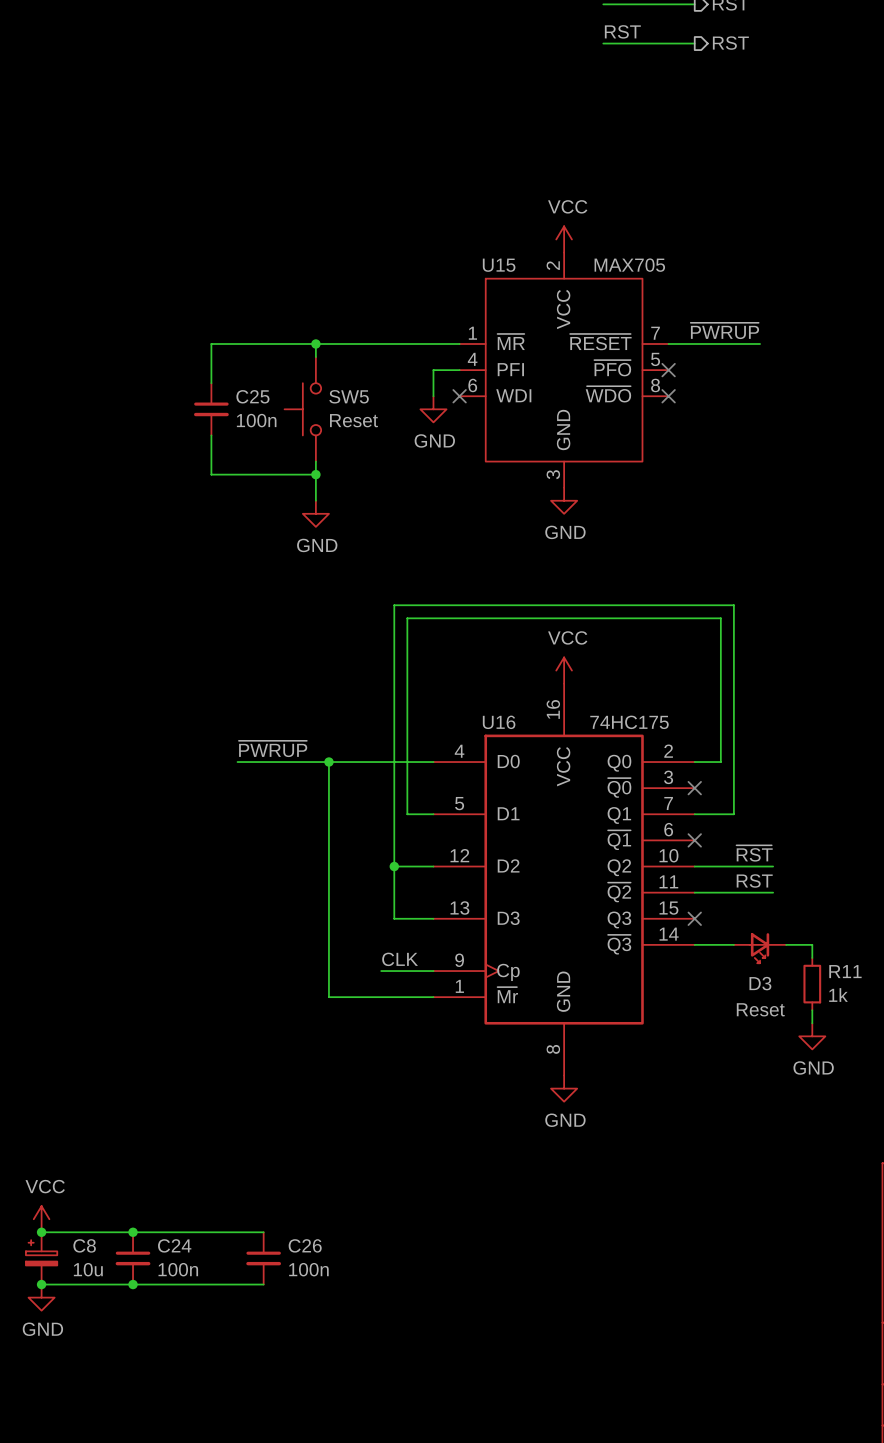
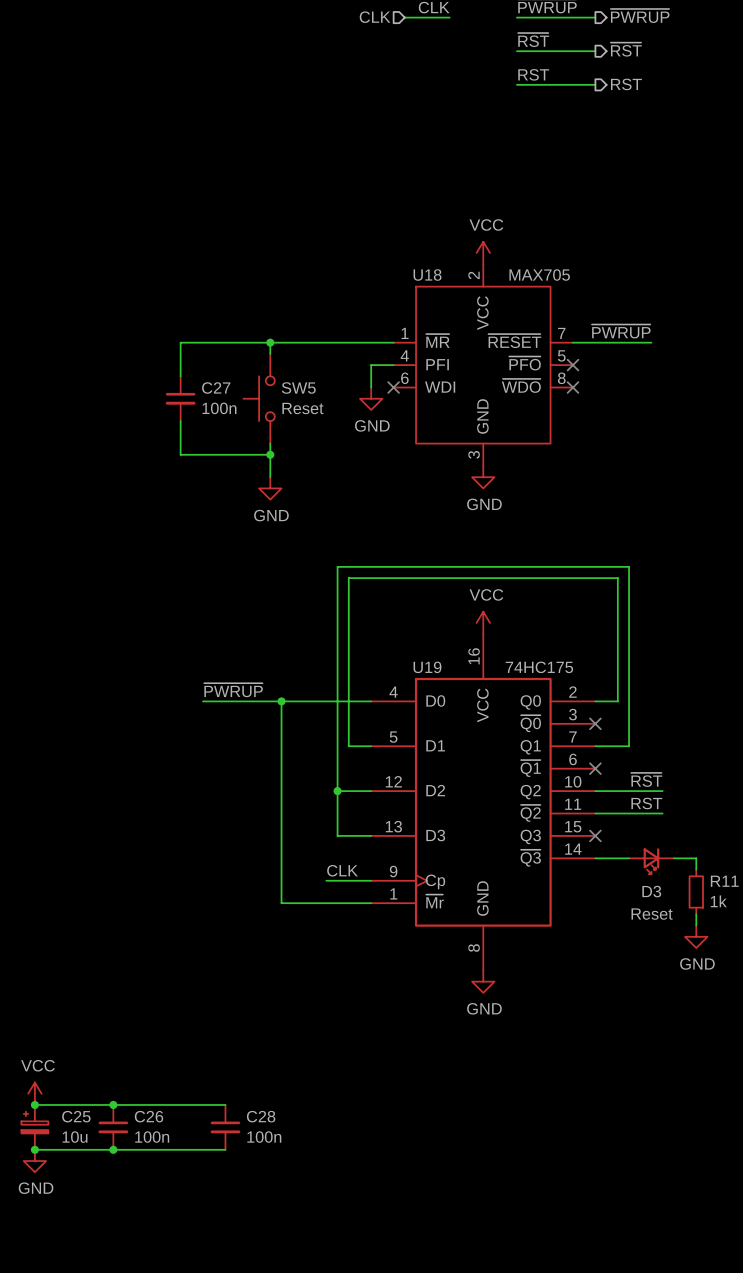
U15 name: U15 (499, 265) -> U18 (427, 275)
C25 name: C25 (252, 396) -> C27 (216, 388)
U16 name: U16 (499, 722) -> U19 (427, 667)
C8 name: C8 (84, 1245) -> C25 (76, 1116)
C24 name: C24 (174, 1245) -> C26 (148, 1116)
C26 name: C26 (305, 1245) -> C28 (261, 1116)

